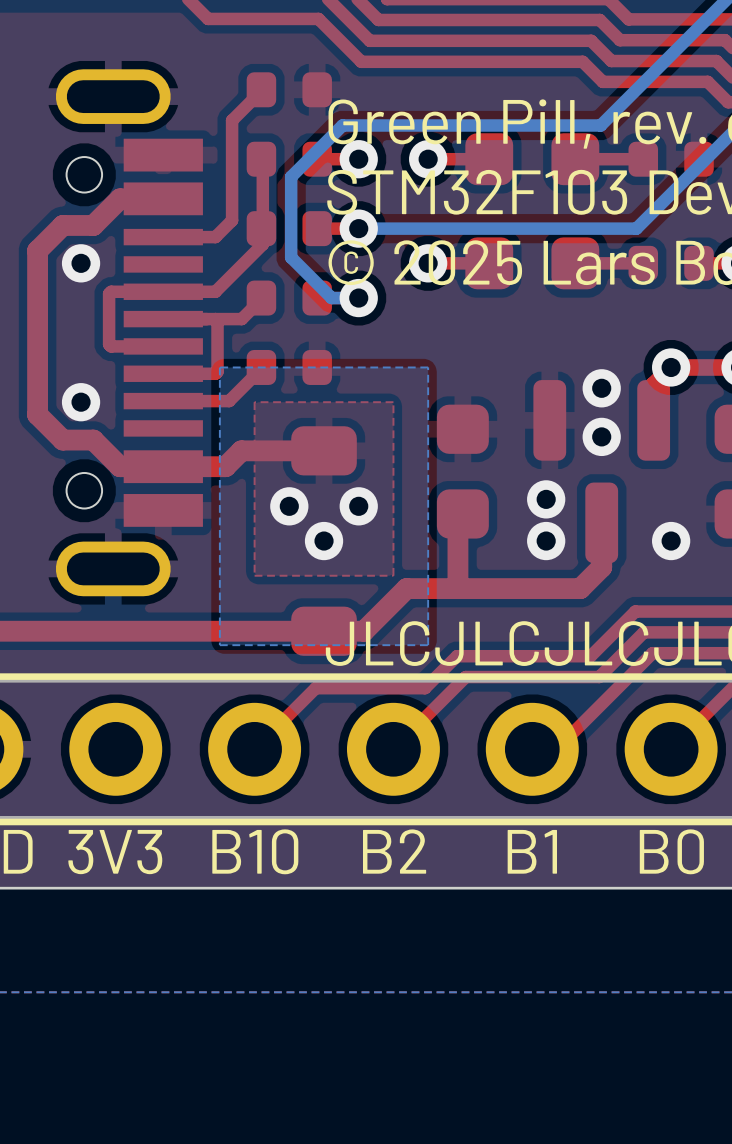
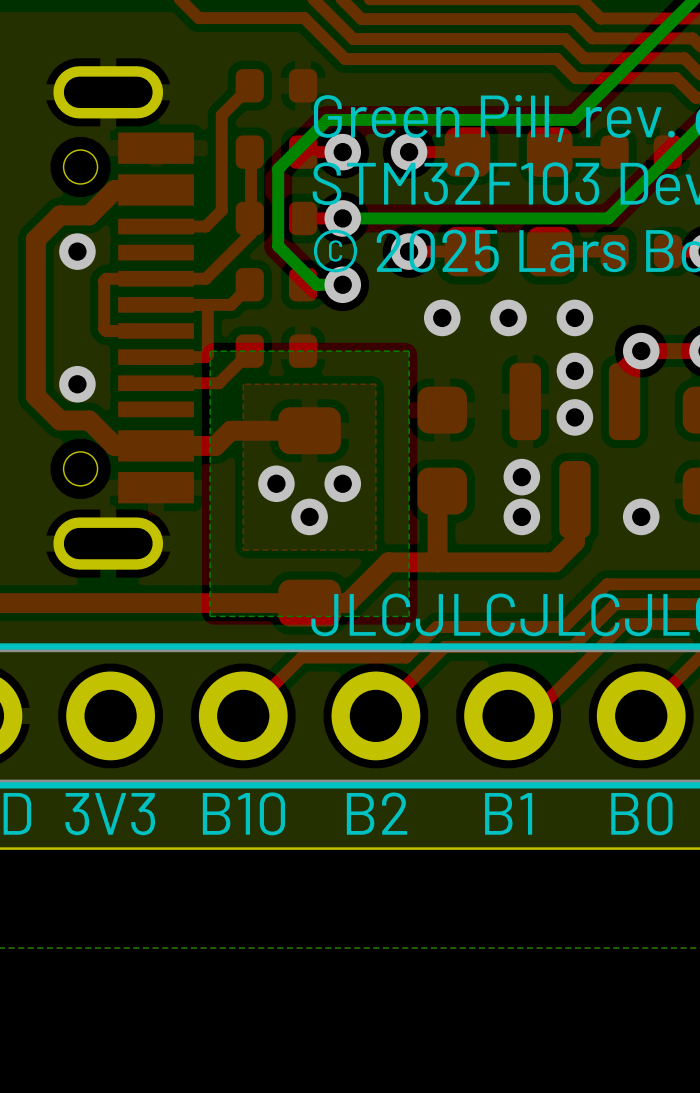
via: none -> (442, 317)
via: none -> (508, 317)
via: none -> (574, 317)

